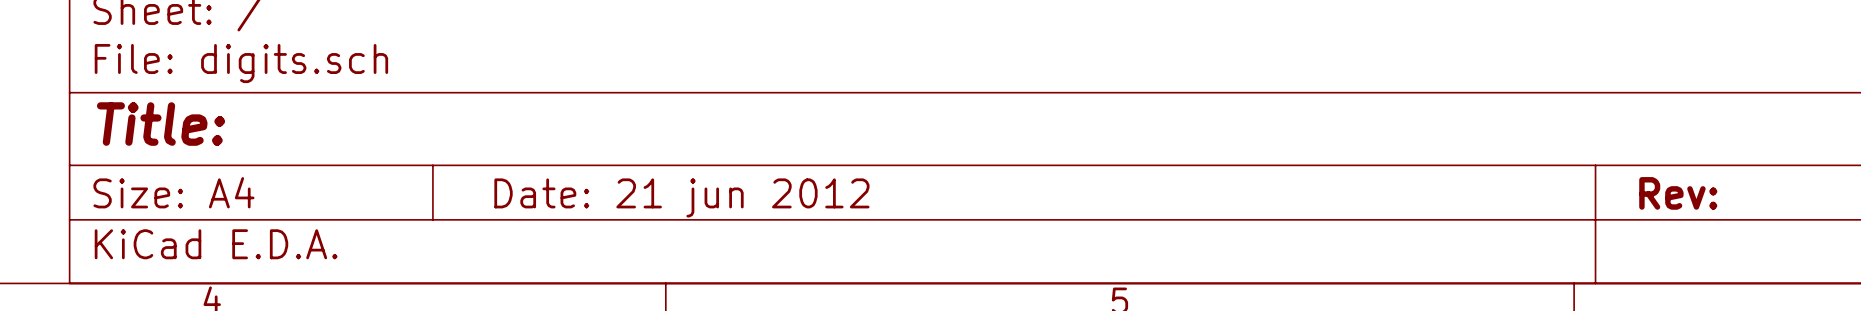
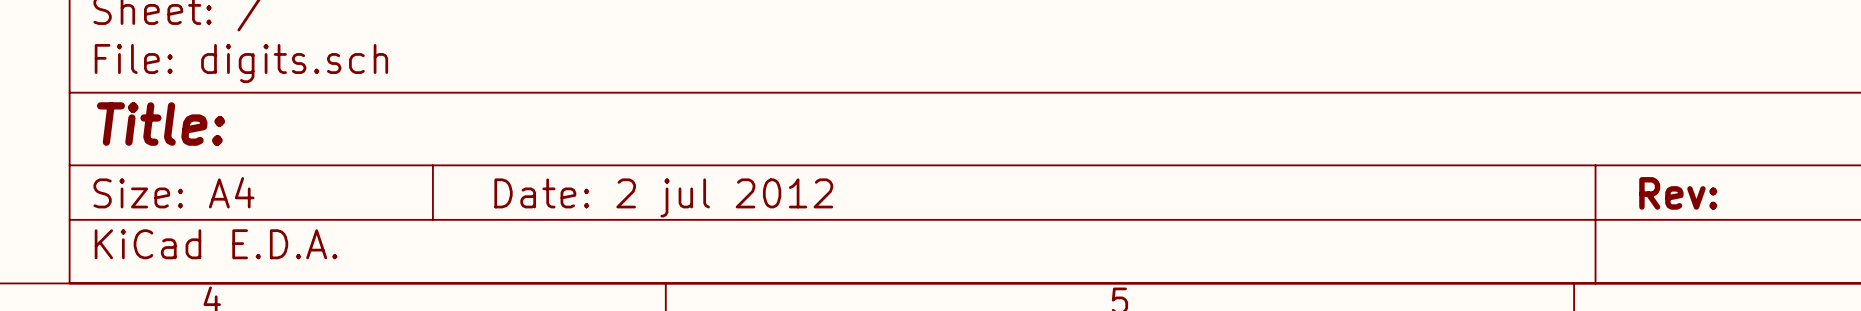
title block: Date: 21 jun 2012 (681, 197) -> Date: 2 jul 2012 (663, 197)

